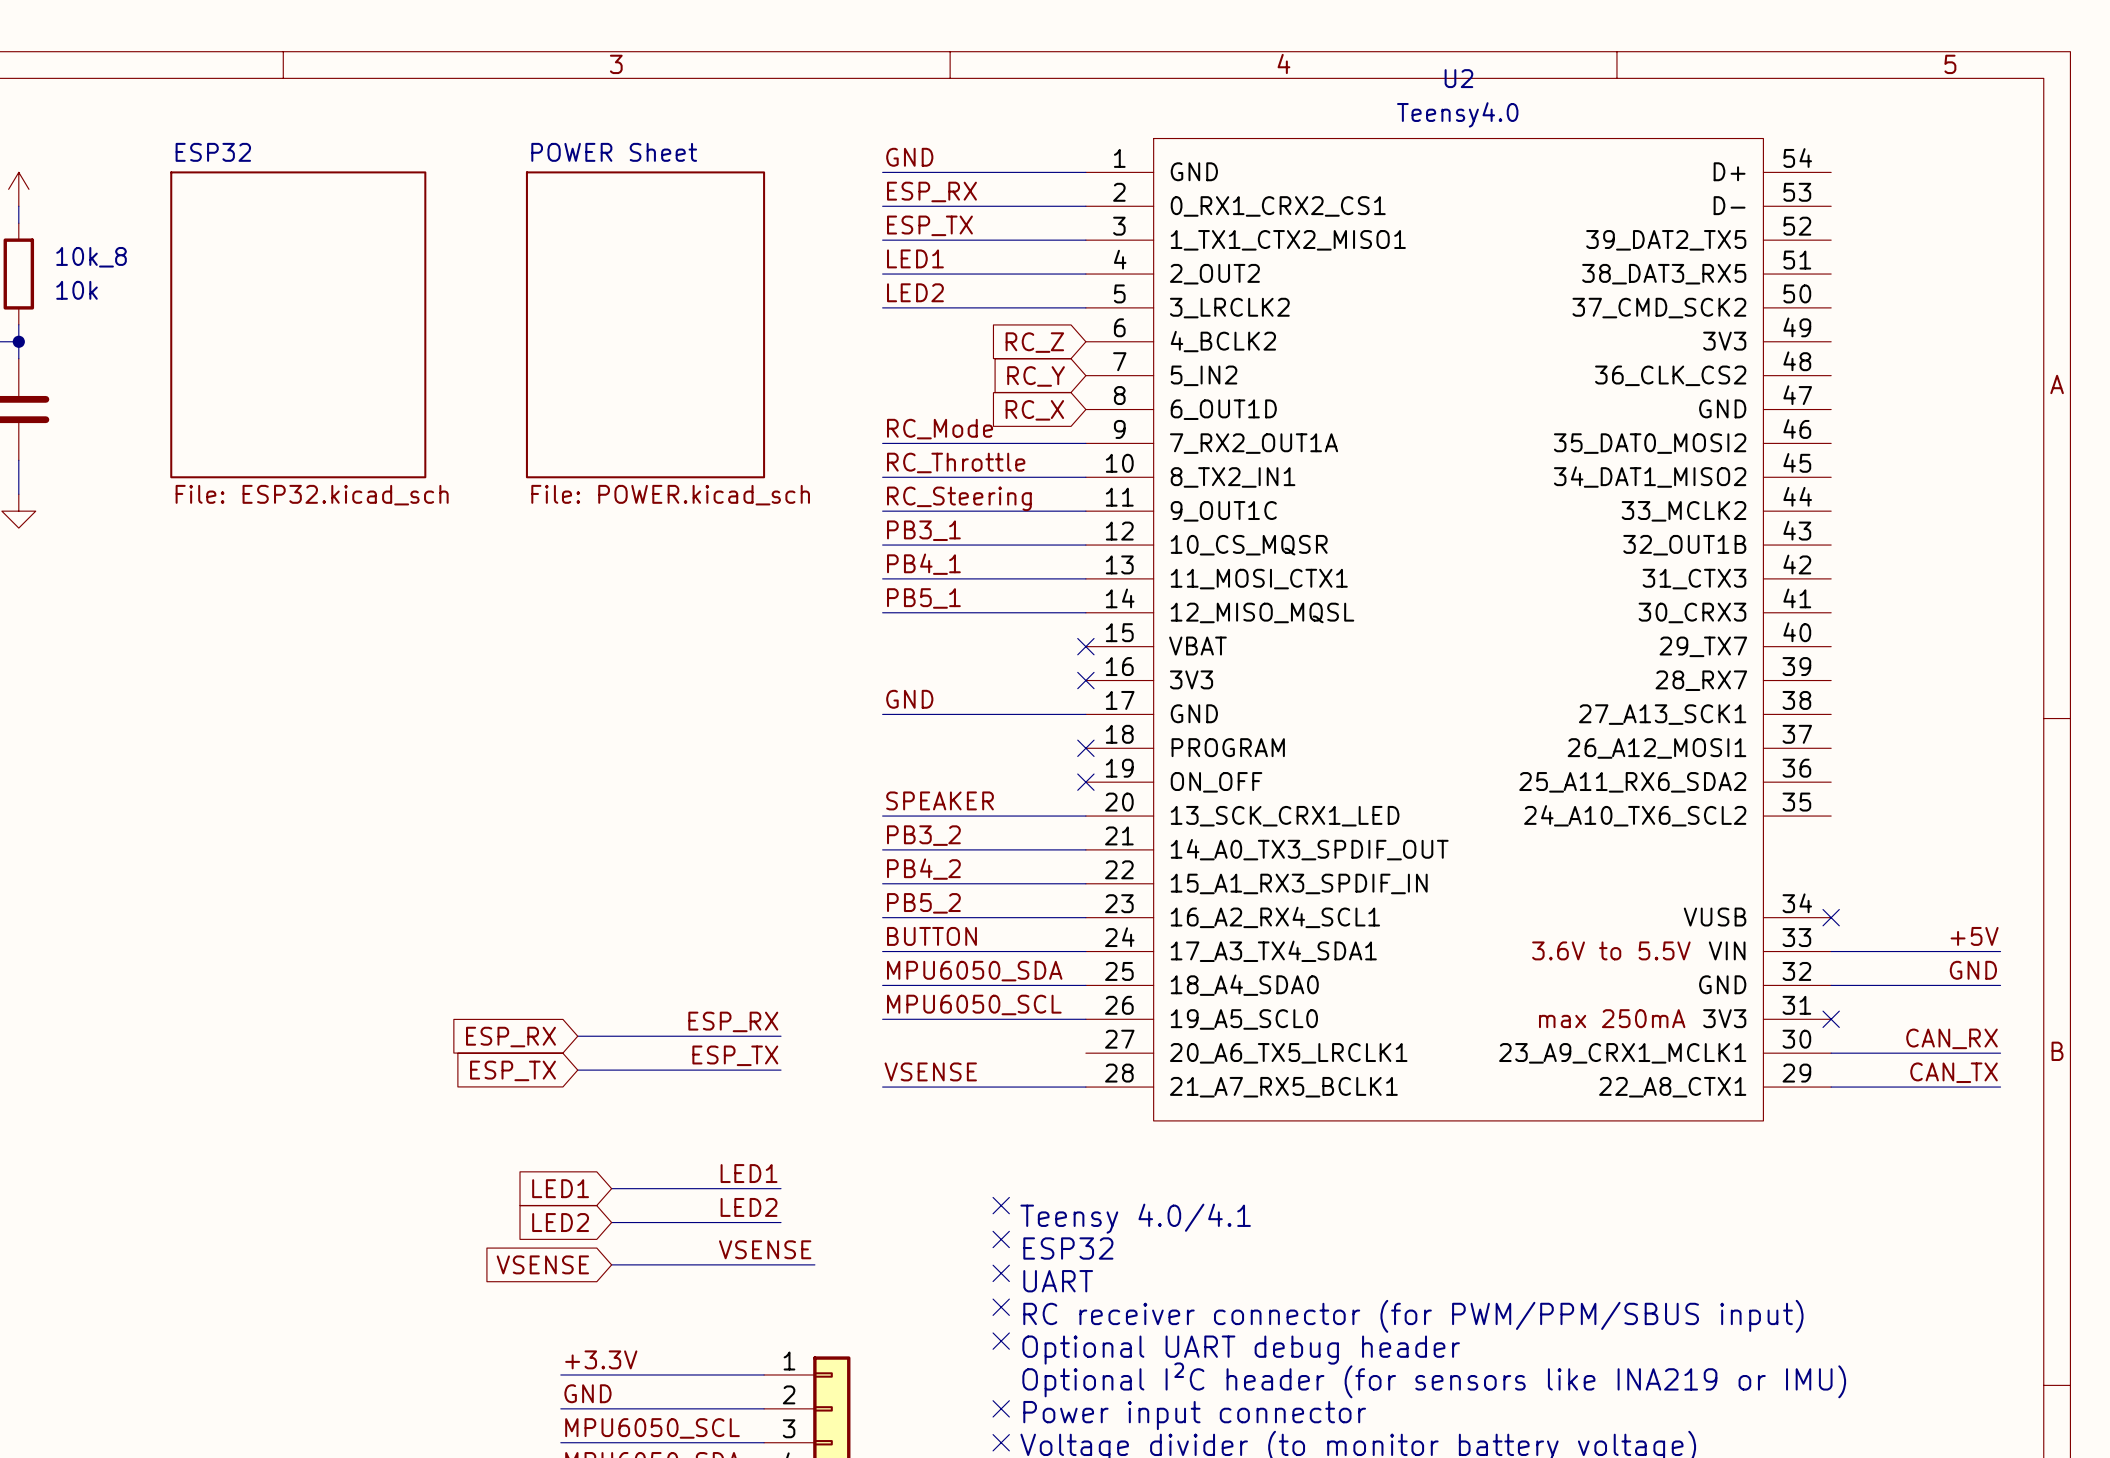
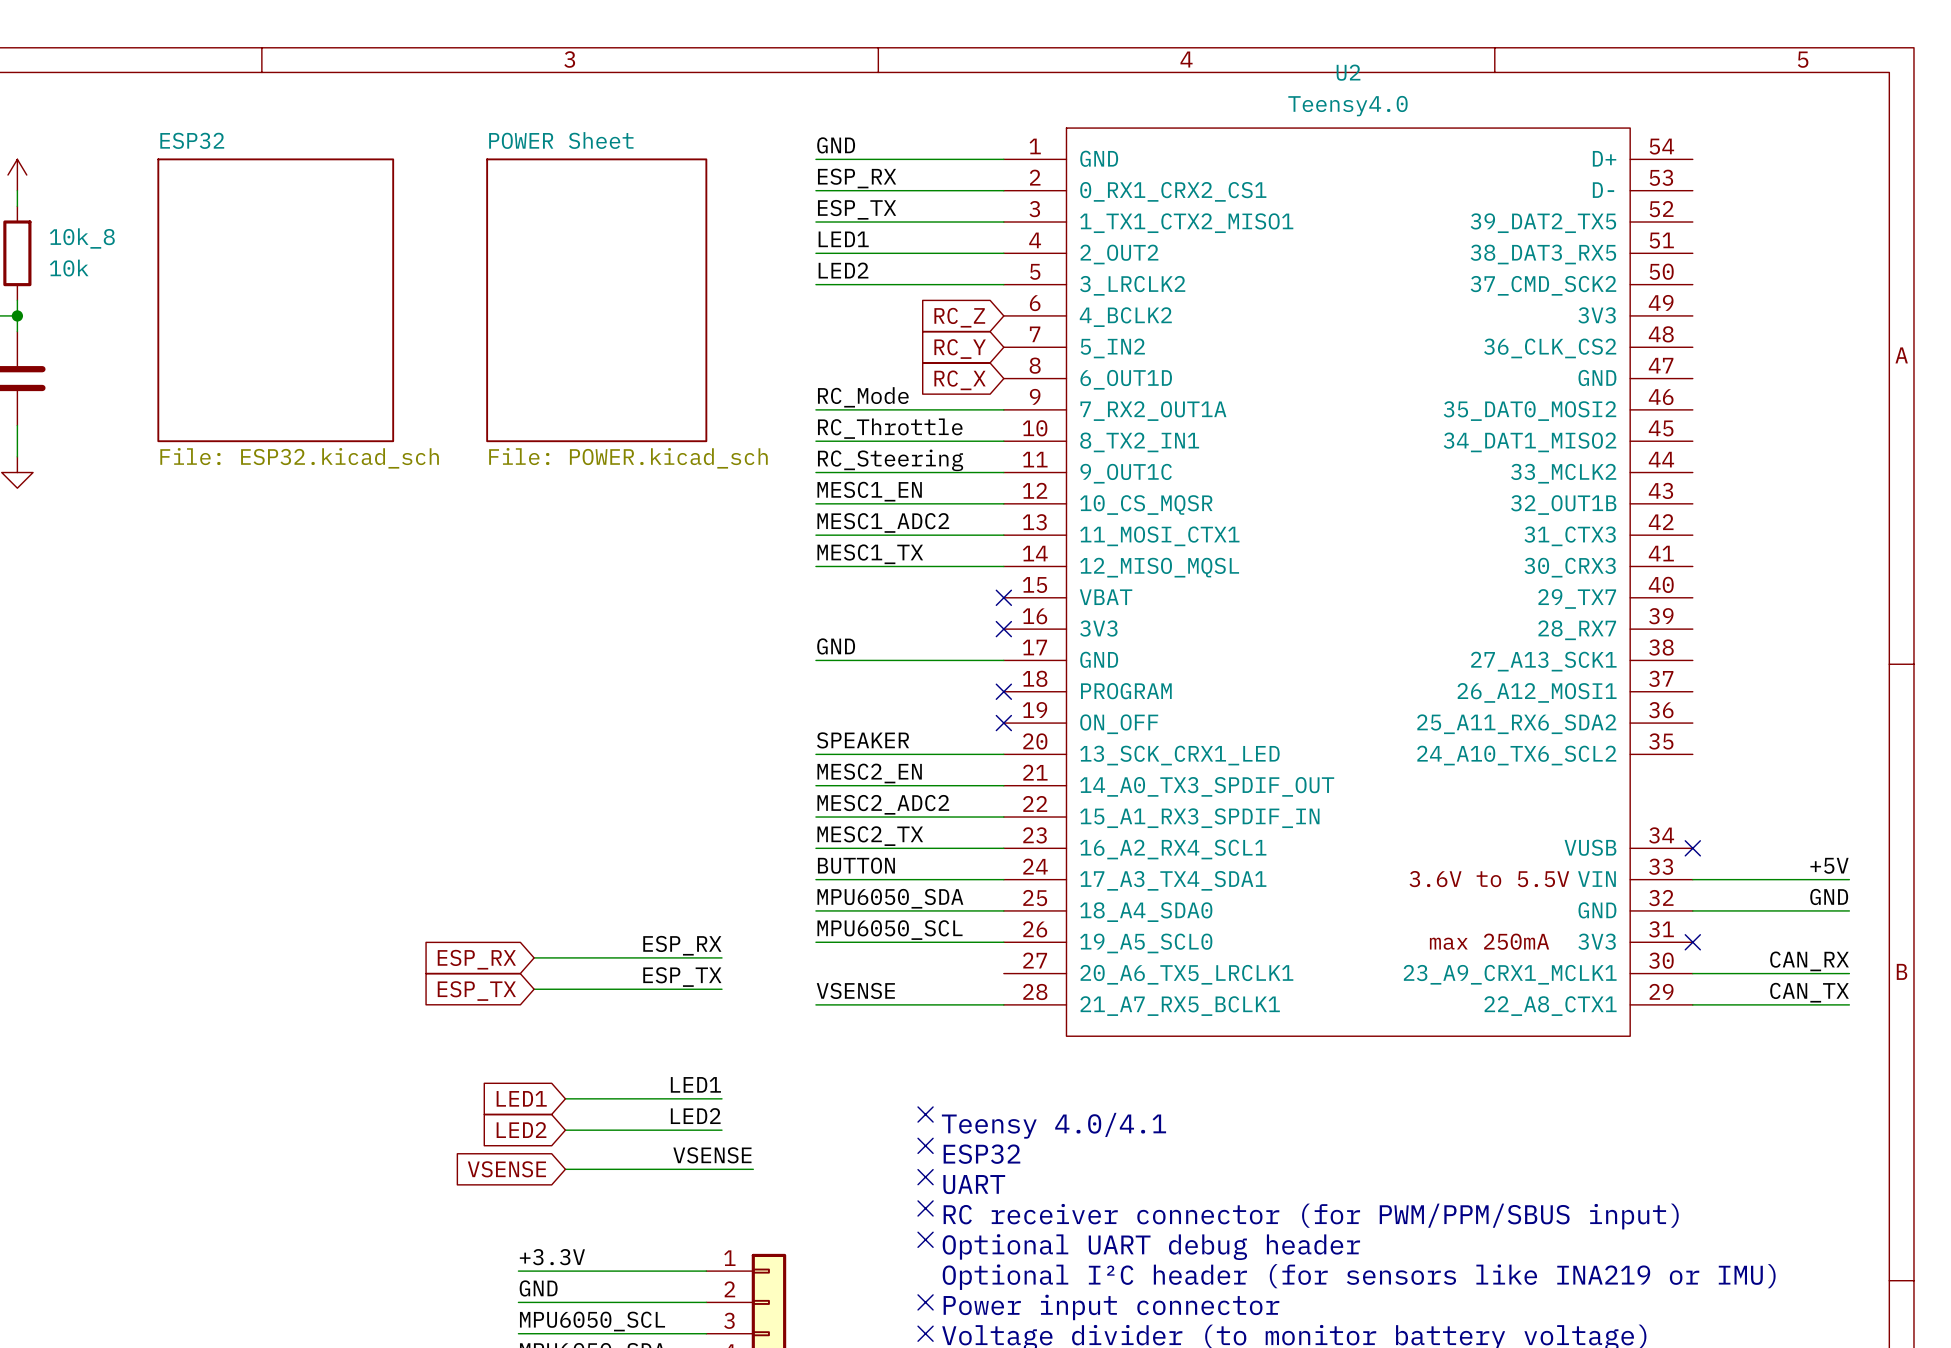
label: PB3_1 (923, 530) -> MESC1_EN (869, 491)
label: PB4_1 (923, 564) -> MESC1_ADC2 (883, 522)
label: PB5_1 (923, 598) -> MESC1_TX (870, 554)
label: PB3_2 (923, 835) -> MESC2_EN (869, 773)
label: PB4_2 (923, 869) -> MESC2_ADC2 (883, 804)
label: PB5_2 (923, 903) -> MESC2_TX (870, 836)

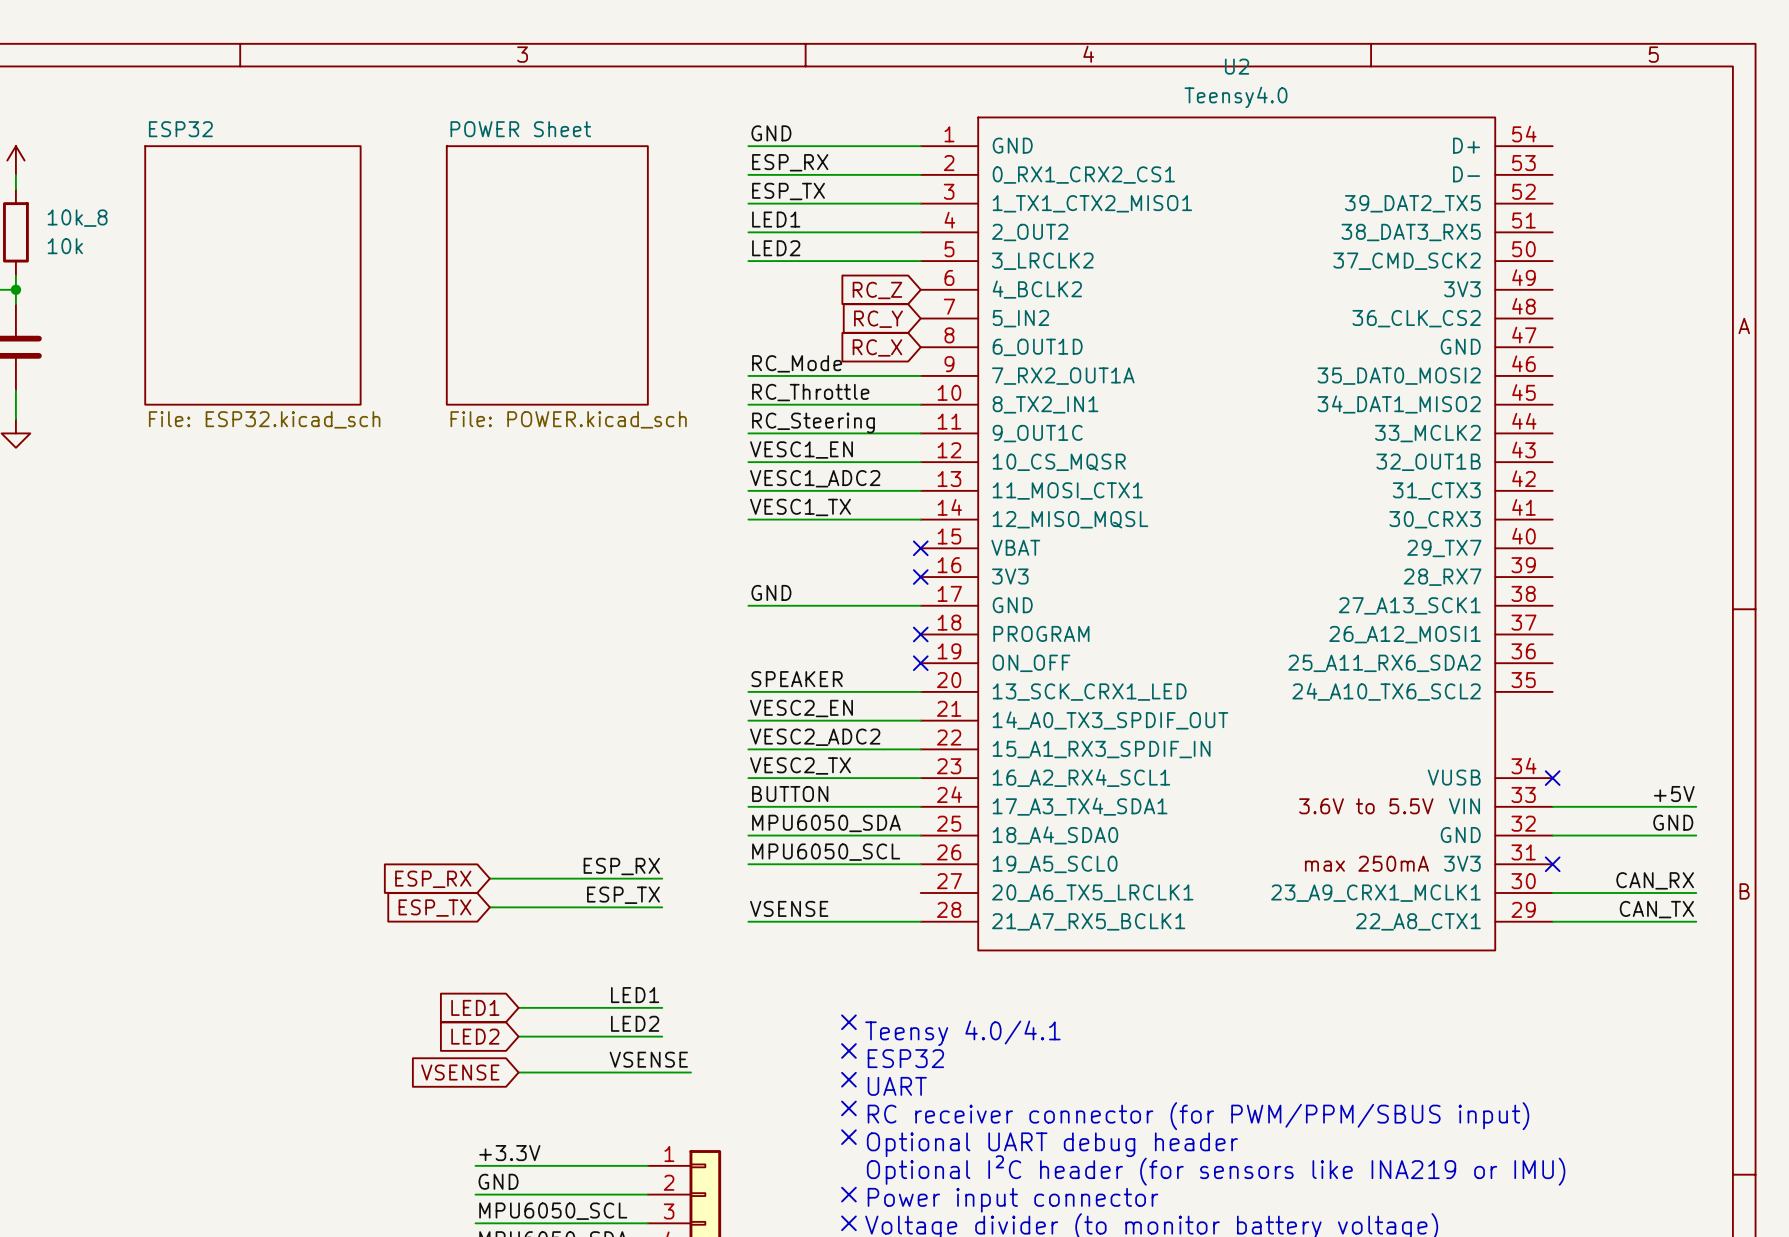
label: MESC1_EN (869, 491) -> VESC1_EN (801, 450)
label: MESC1_ADC2 (883, 522) -> VESC1_ADC2 (815, 478)
label: MESC1_TX (870, 554) -> VESC1_TX (800, 507)
label: MESC2_EN (869, 773) -> VESC2_EN (801, 708)
label: MESC2_ADC2 (883, 804) -> VESC2_ADC2 (815, 737)
label: MESC2_TX (870, 836) -> VESC2_TX (800, 765)

